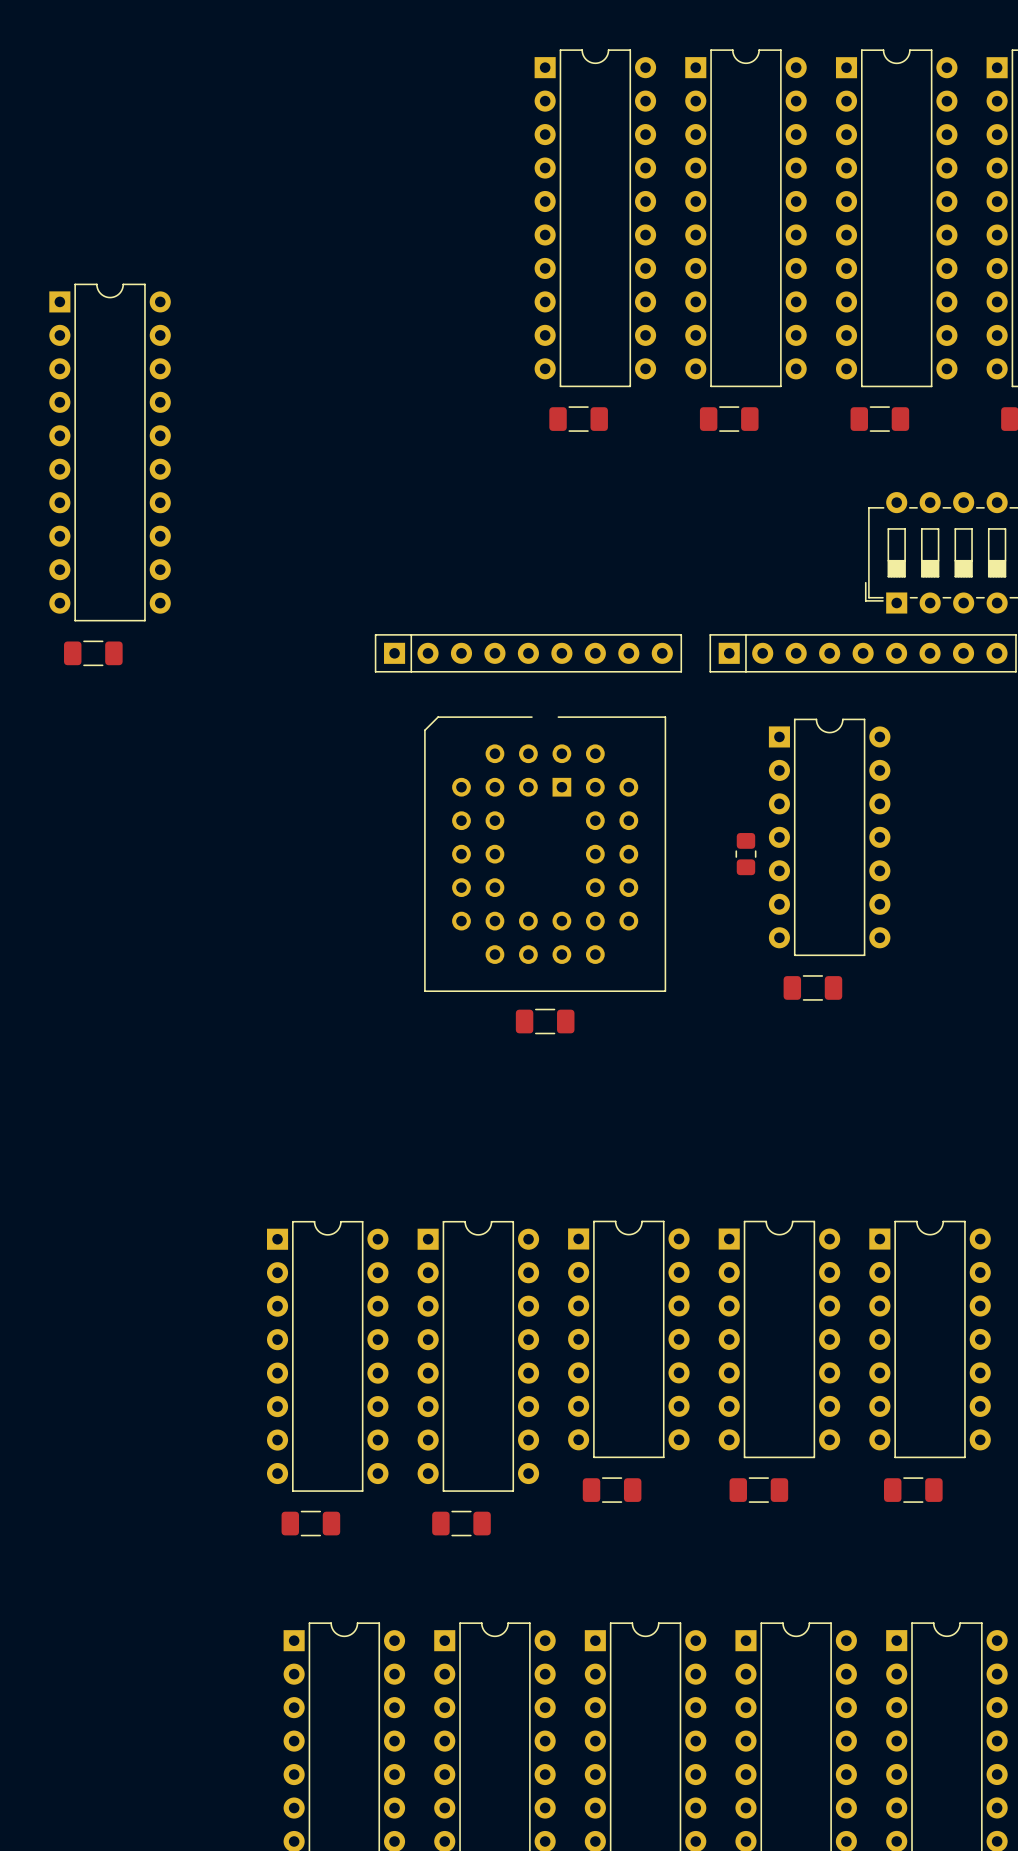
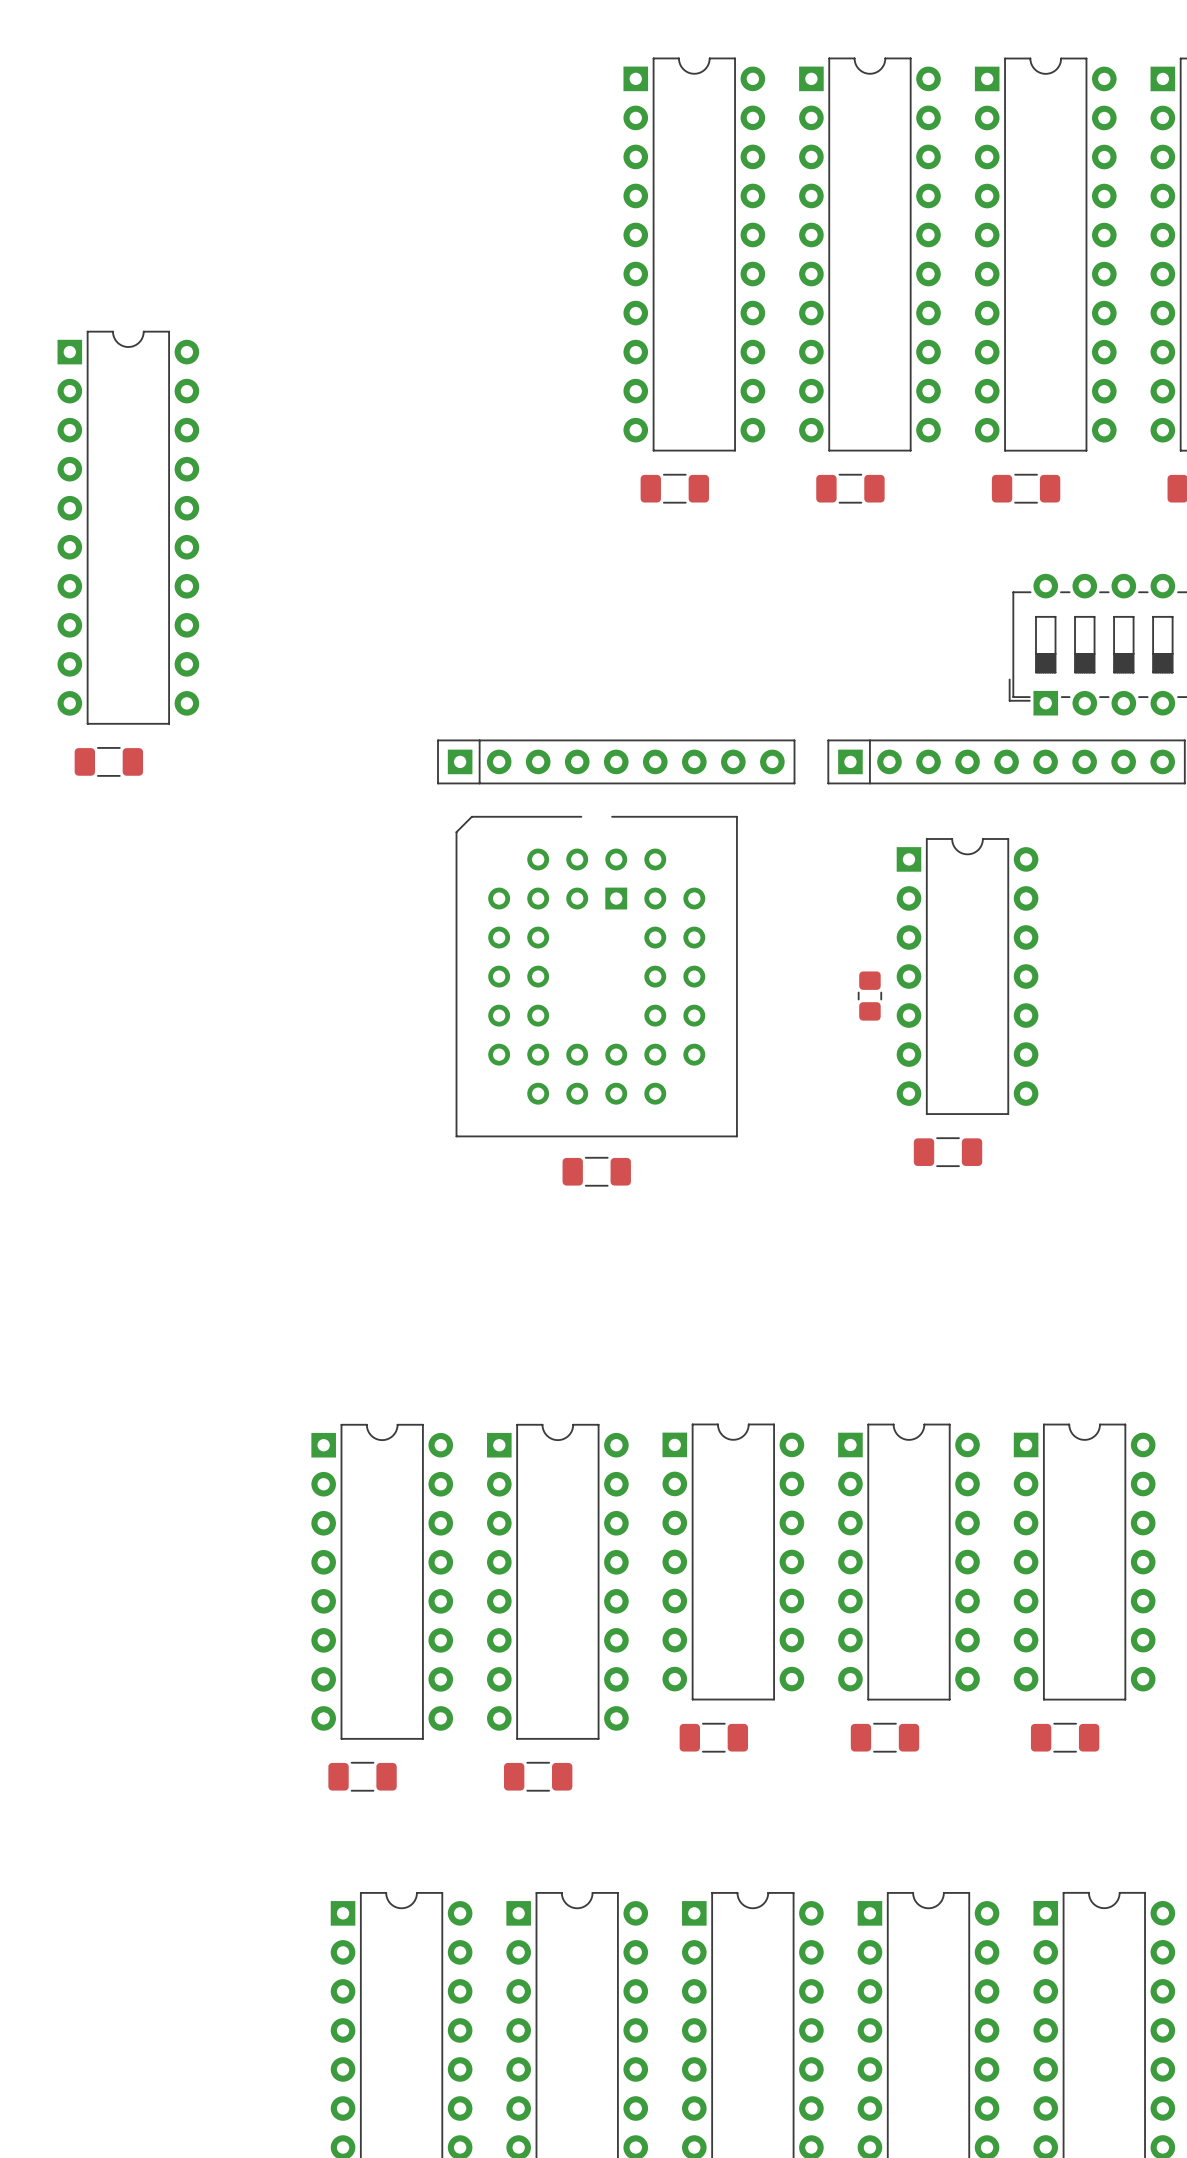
part position: (545, 854) -> (596, 976)
part position: (545, 1021) -> (596, 1171)

